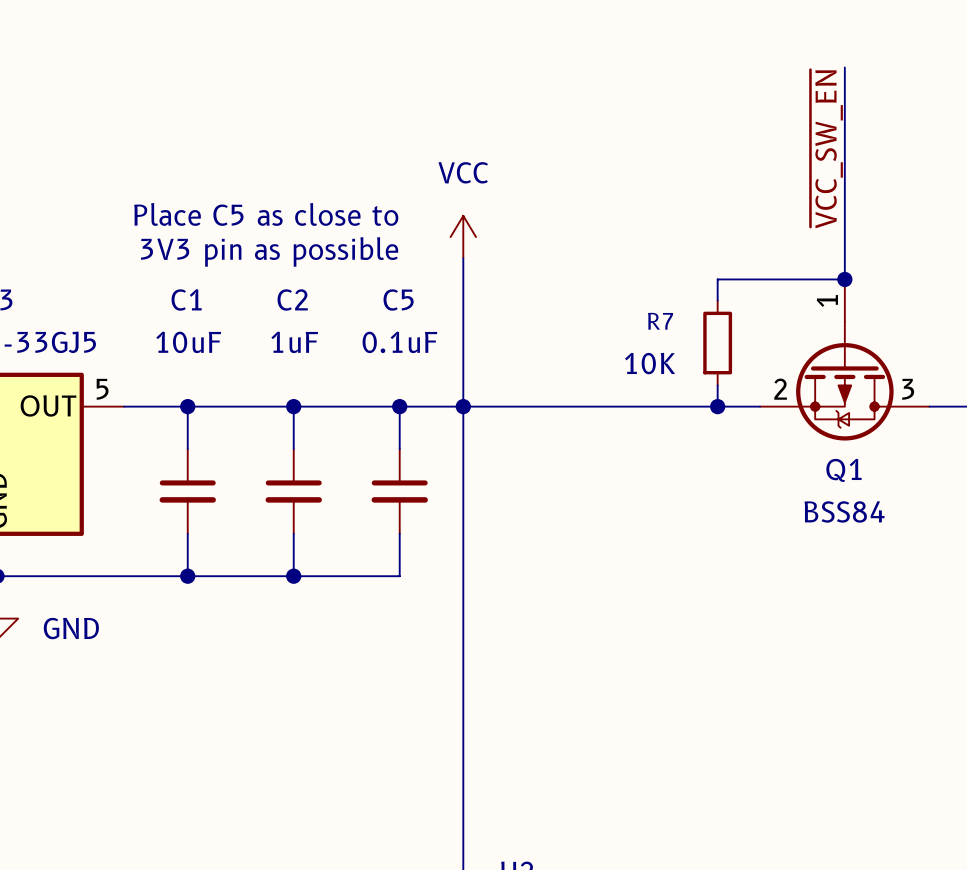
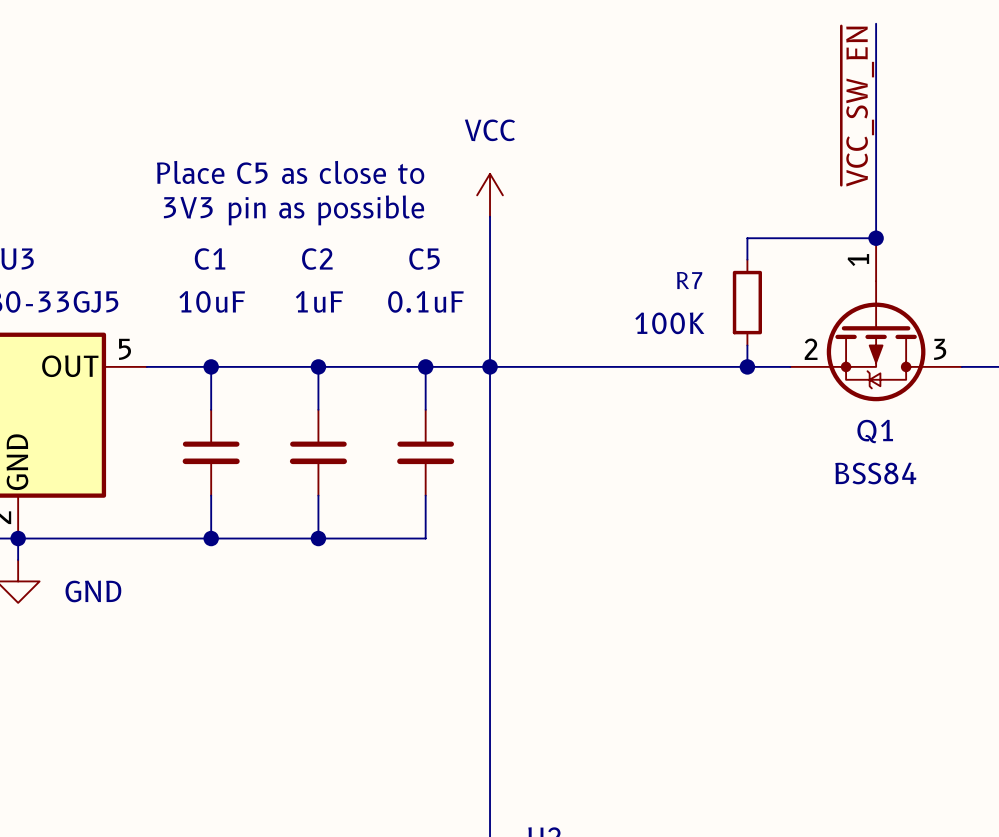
R7 value: 10K (650, 363) -> 100K (669, 323)

